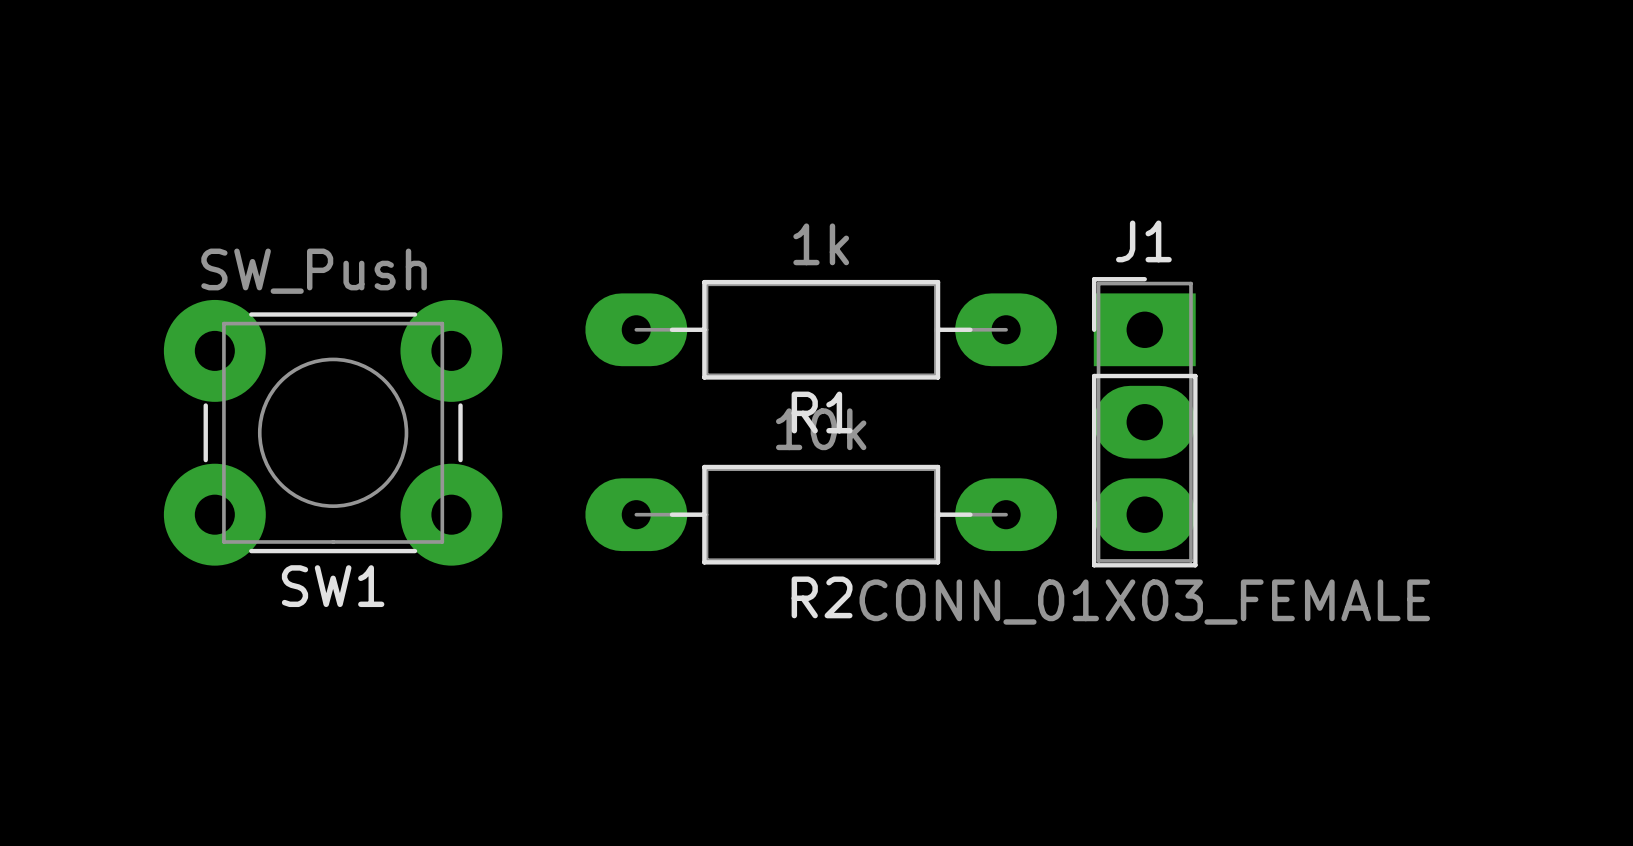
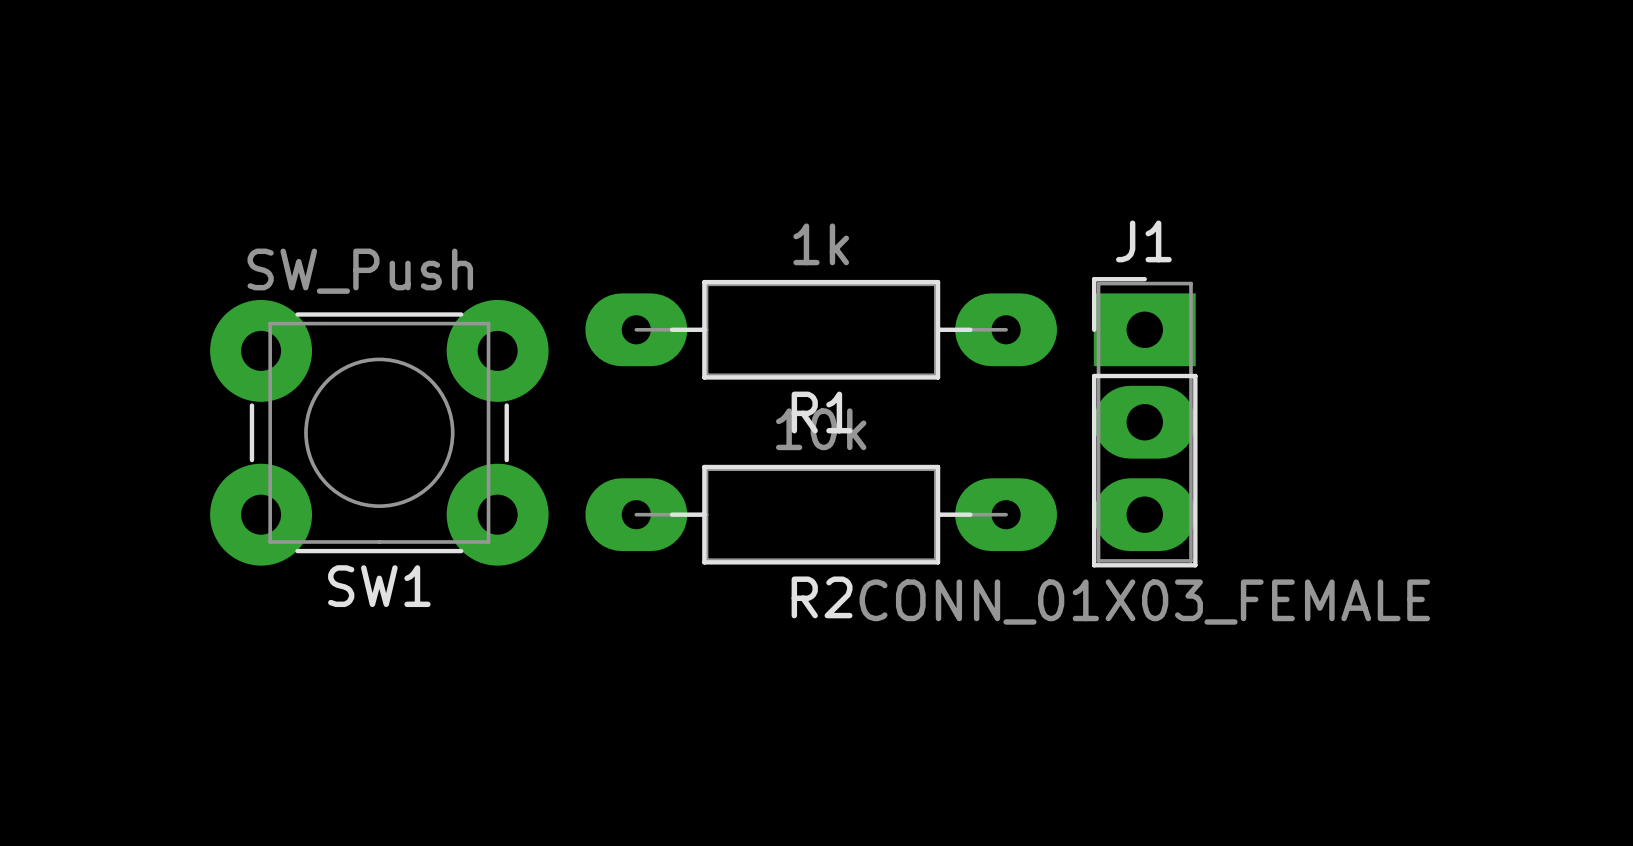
SW1 position: (333, 432) -> (379, 432)

